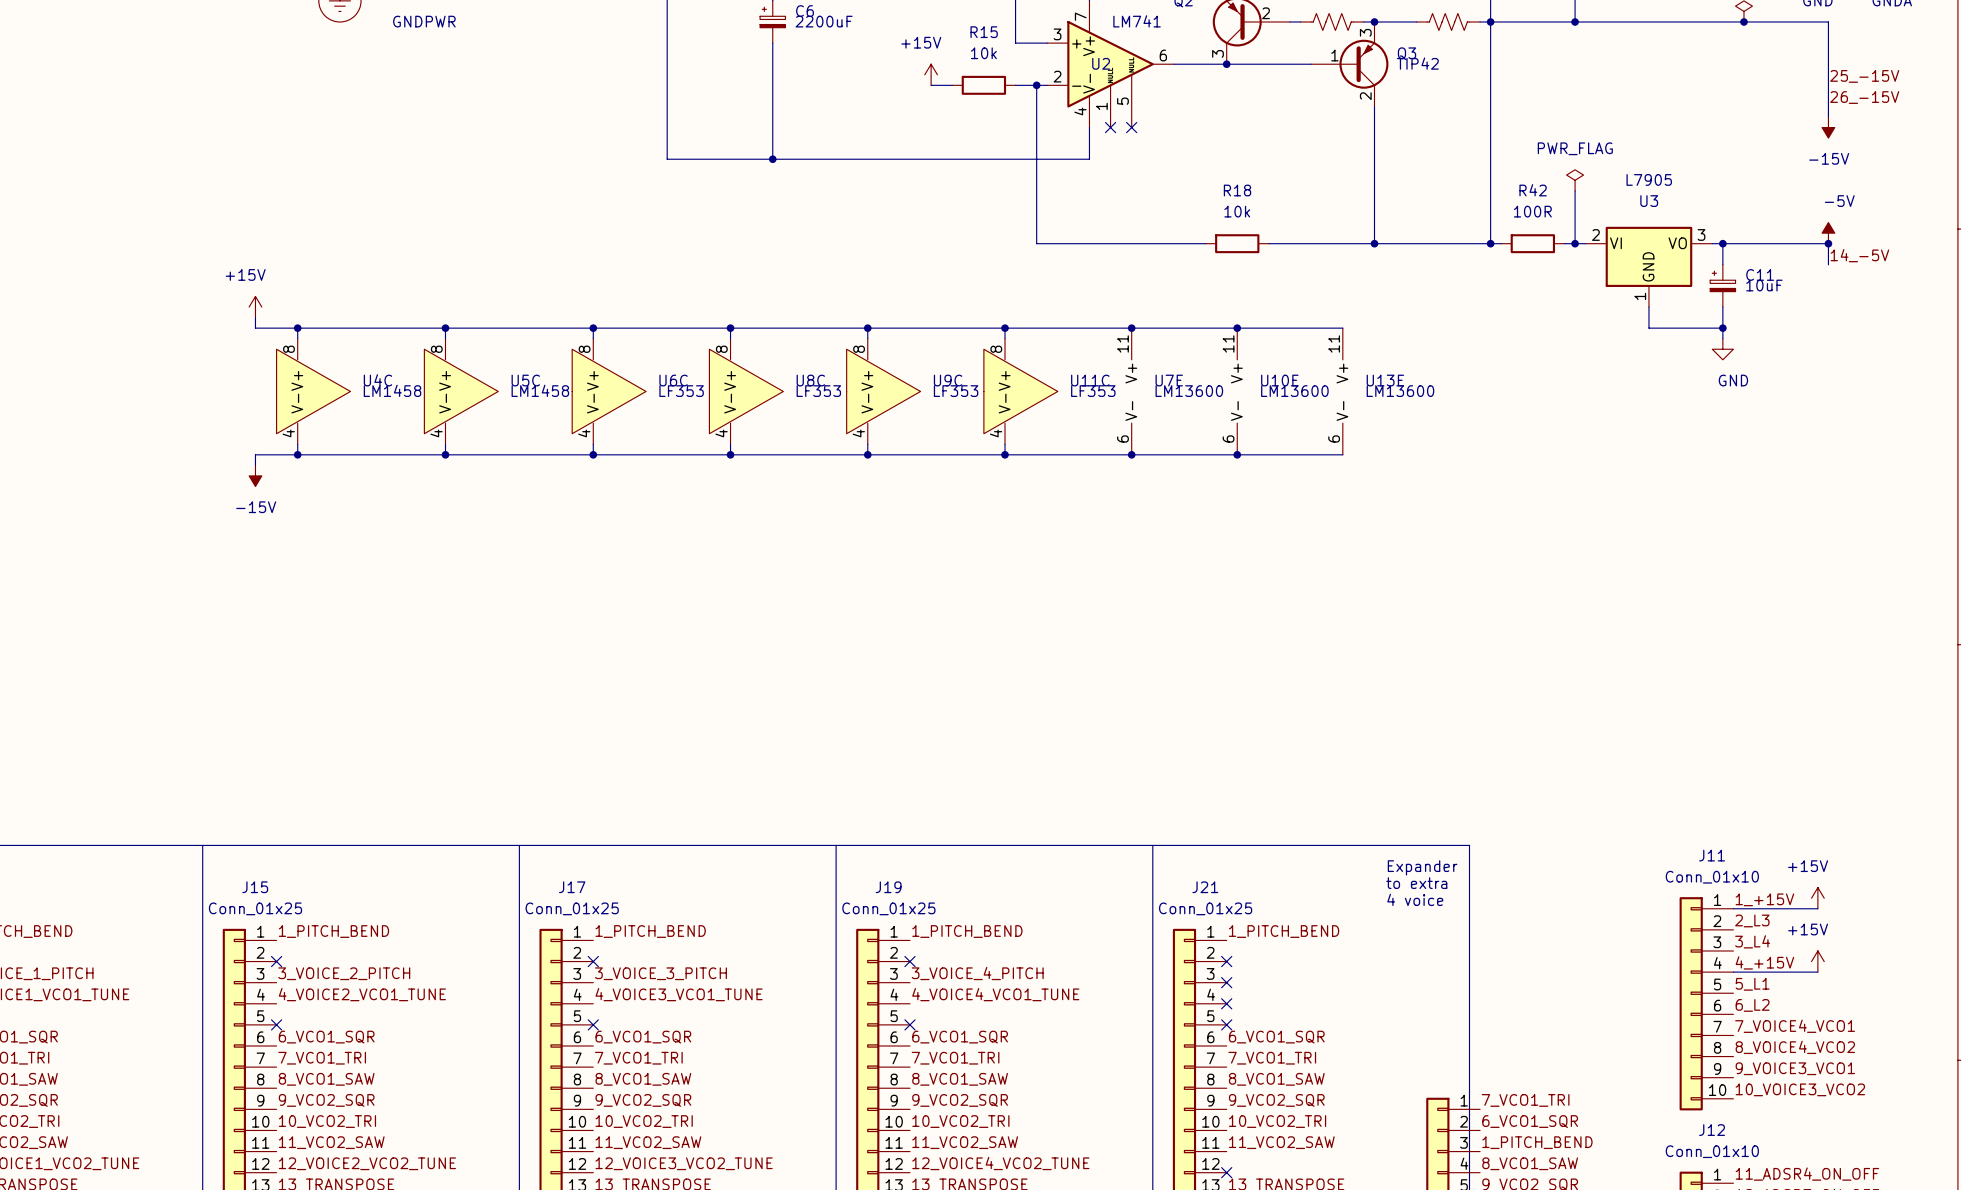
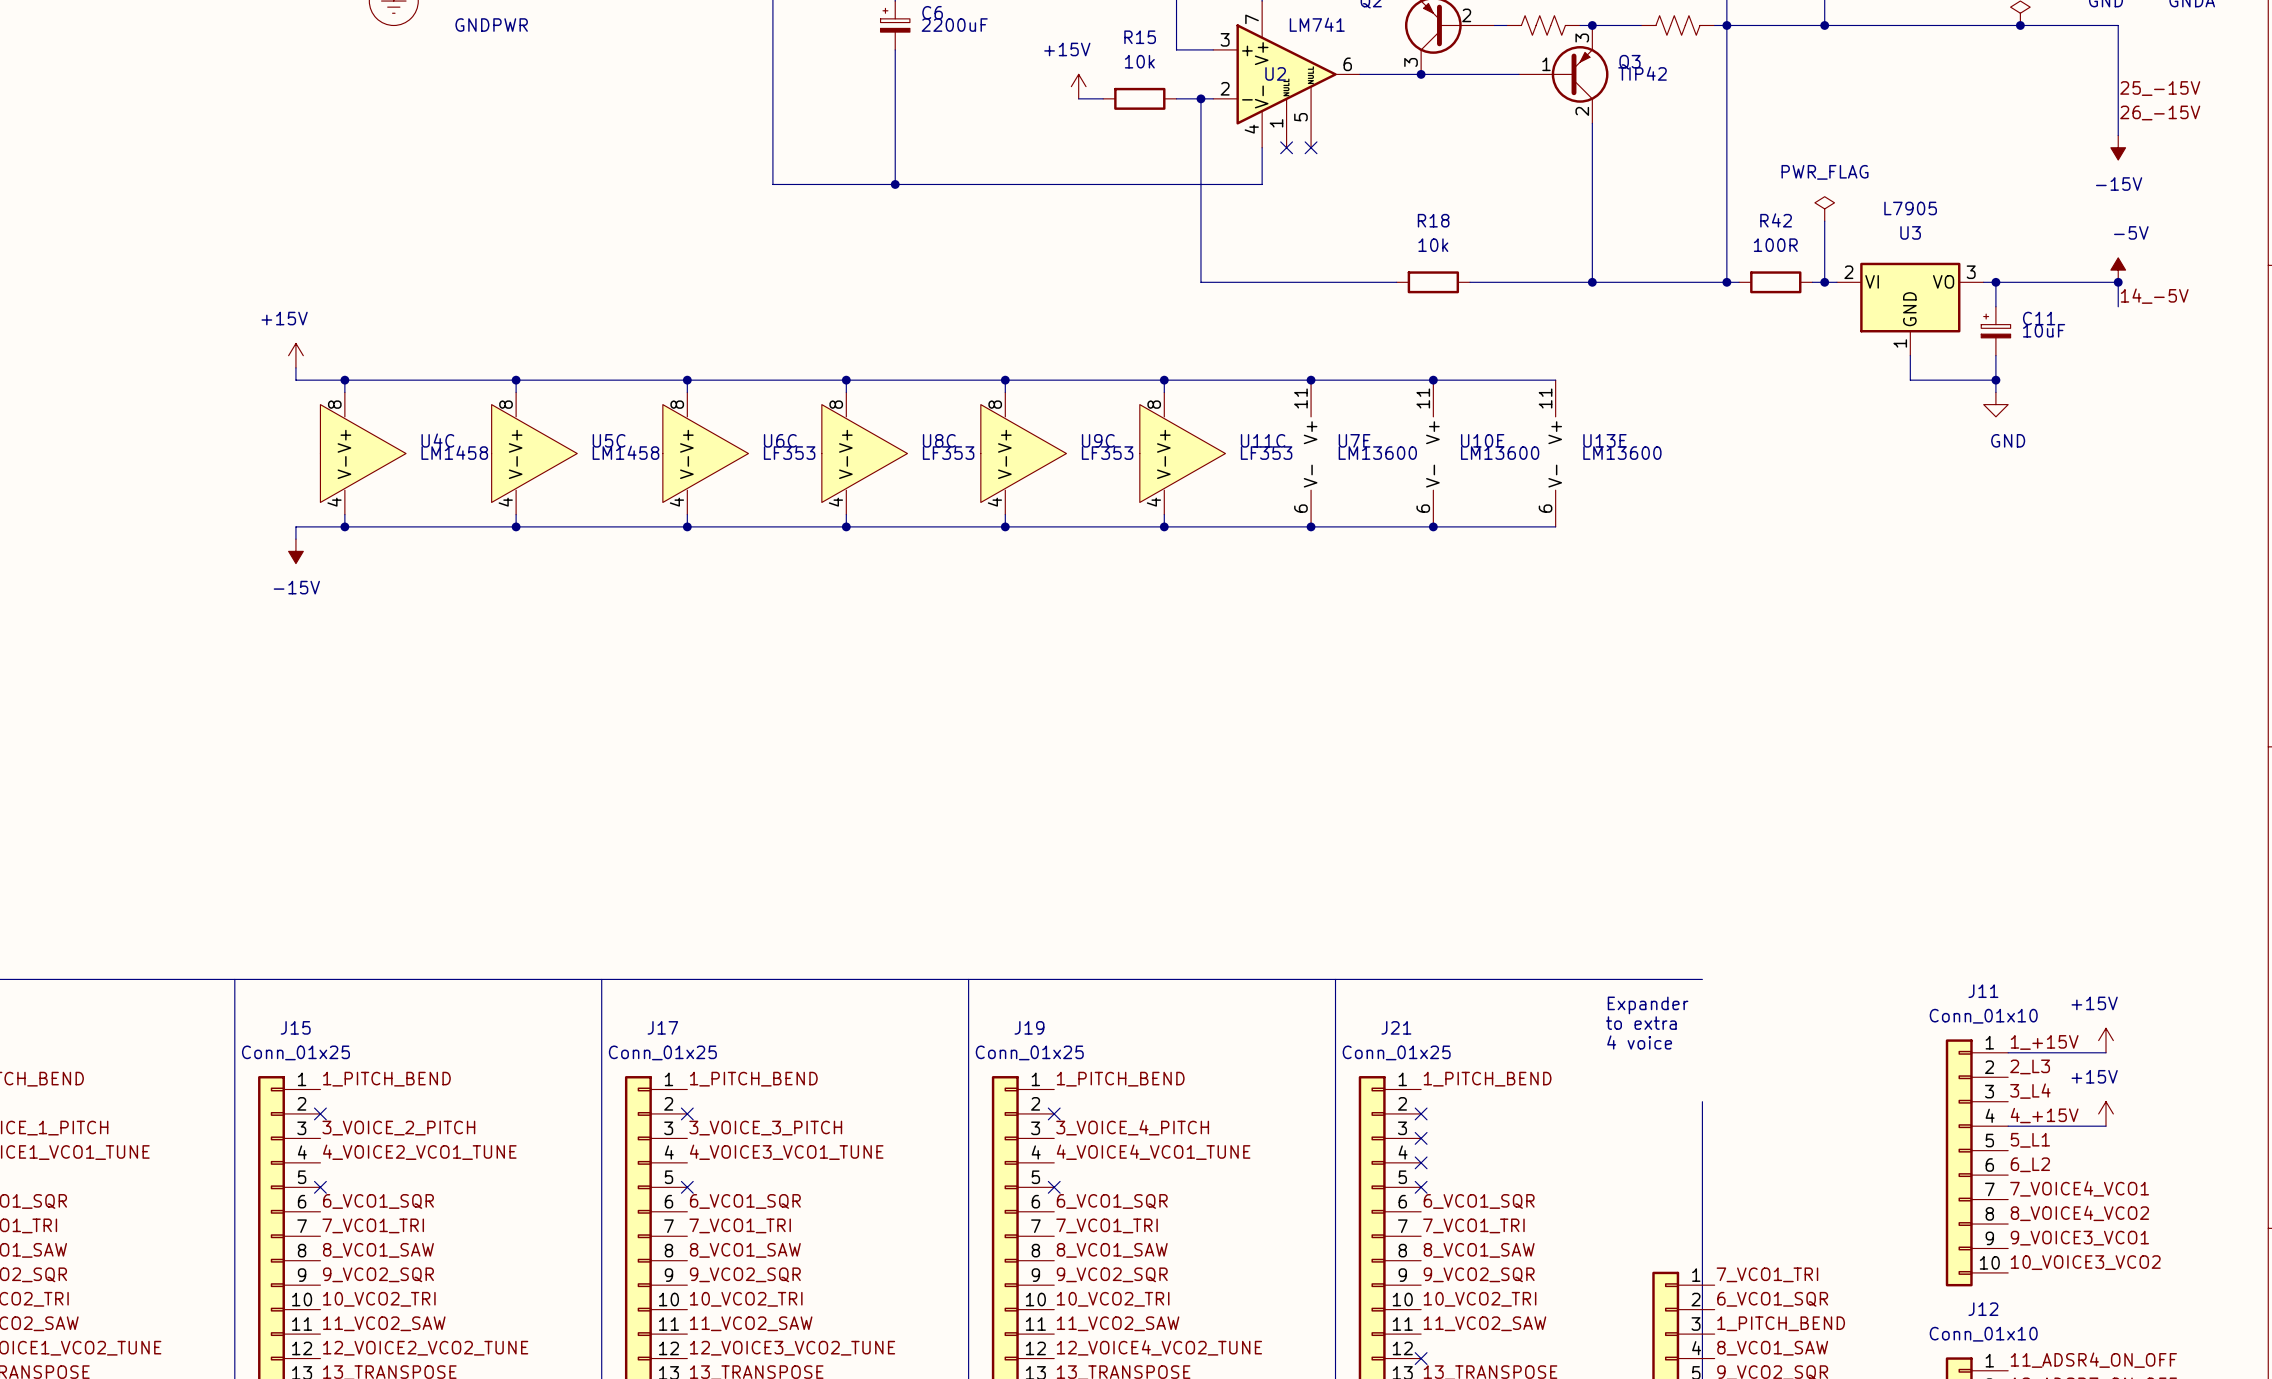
line: (1469, 845) (1469, 950) -> none

